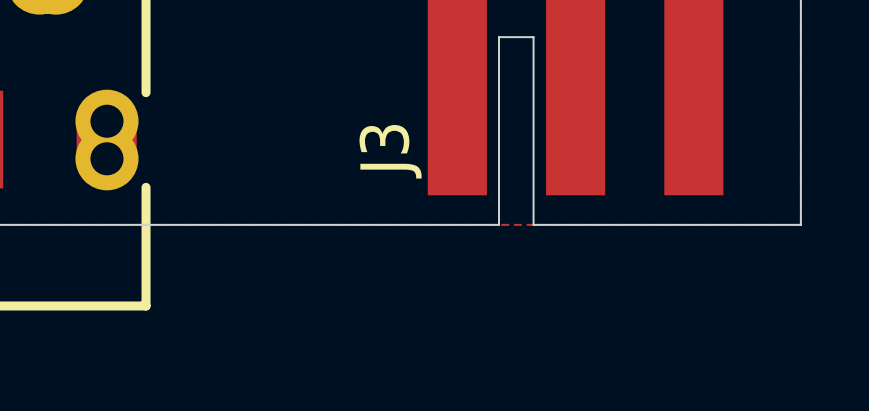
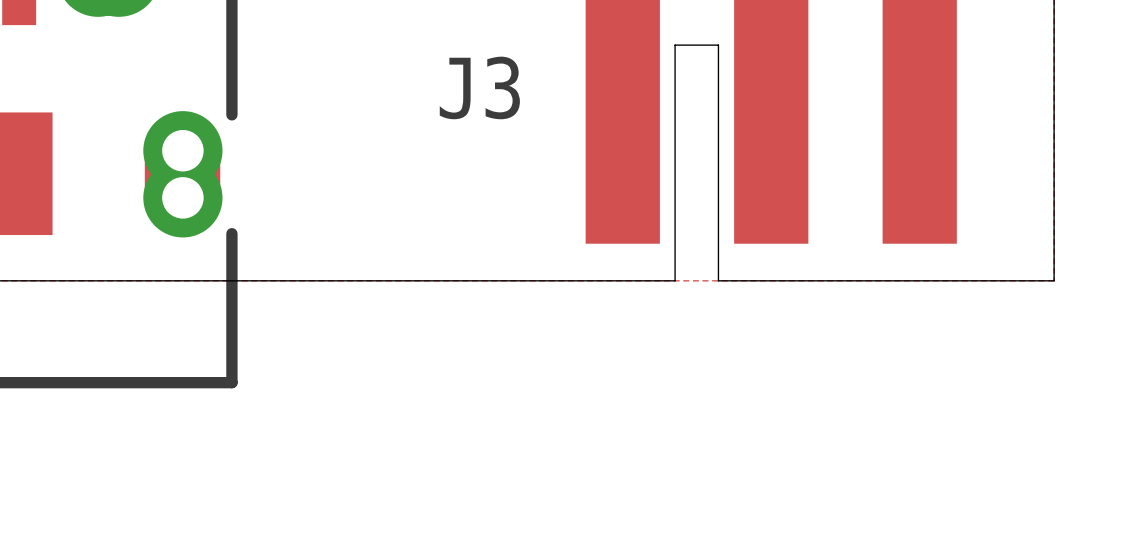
J3 name rotation: 0° (390, 151) -> 90° clockwise (479, 87)
J3 name position: J3 (390, 151) -> J3 (479, 87)

